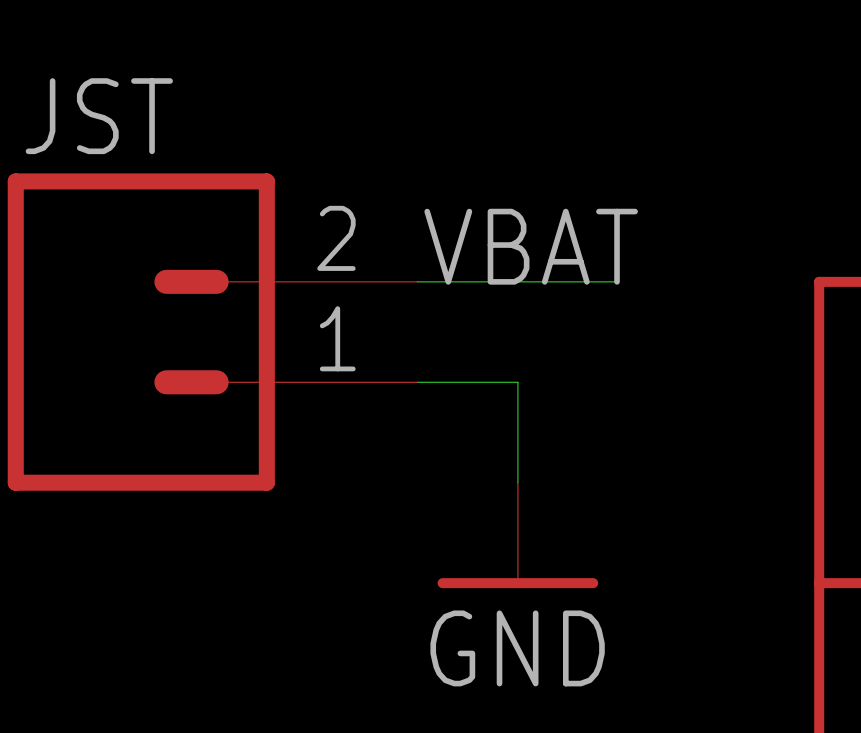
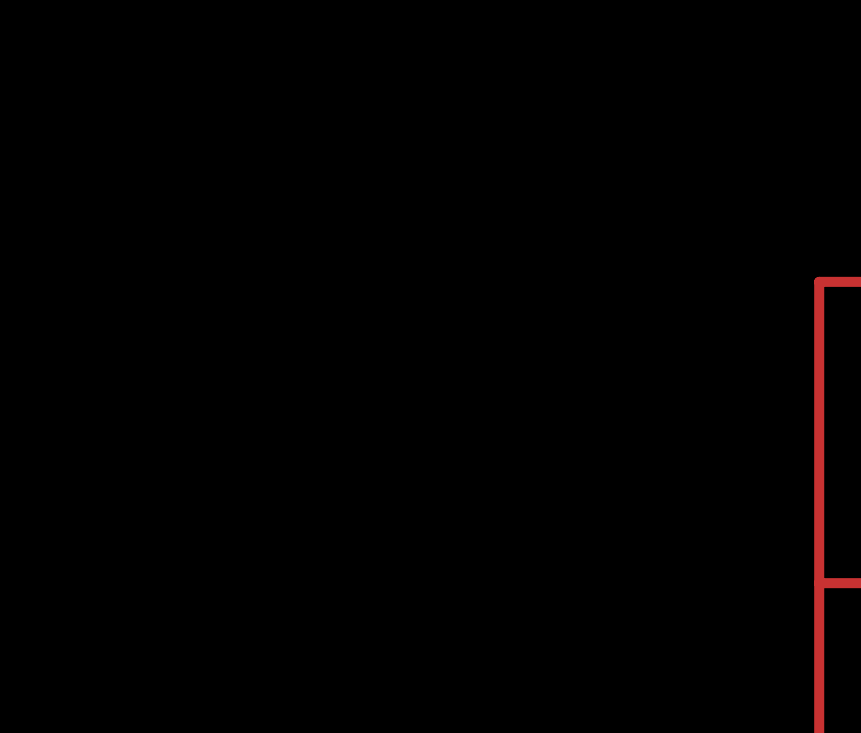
label: VBAT (531, 246) -> none
wire: (417, 281) (618, 281) -> none
JST: (212, 332) -> none
wire: (417, 382) (517, 382) (517, 482) -> none
power symbol: GND (517, 535) -> none

